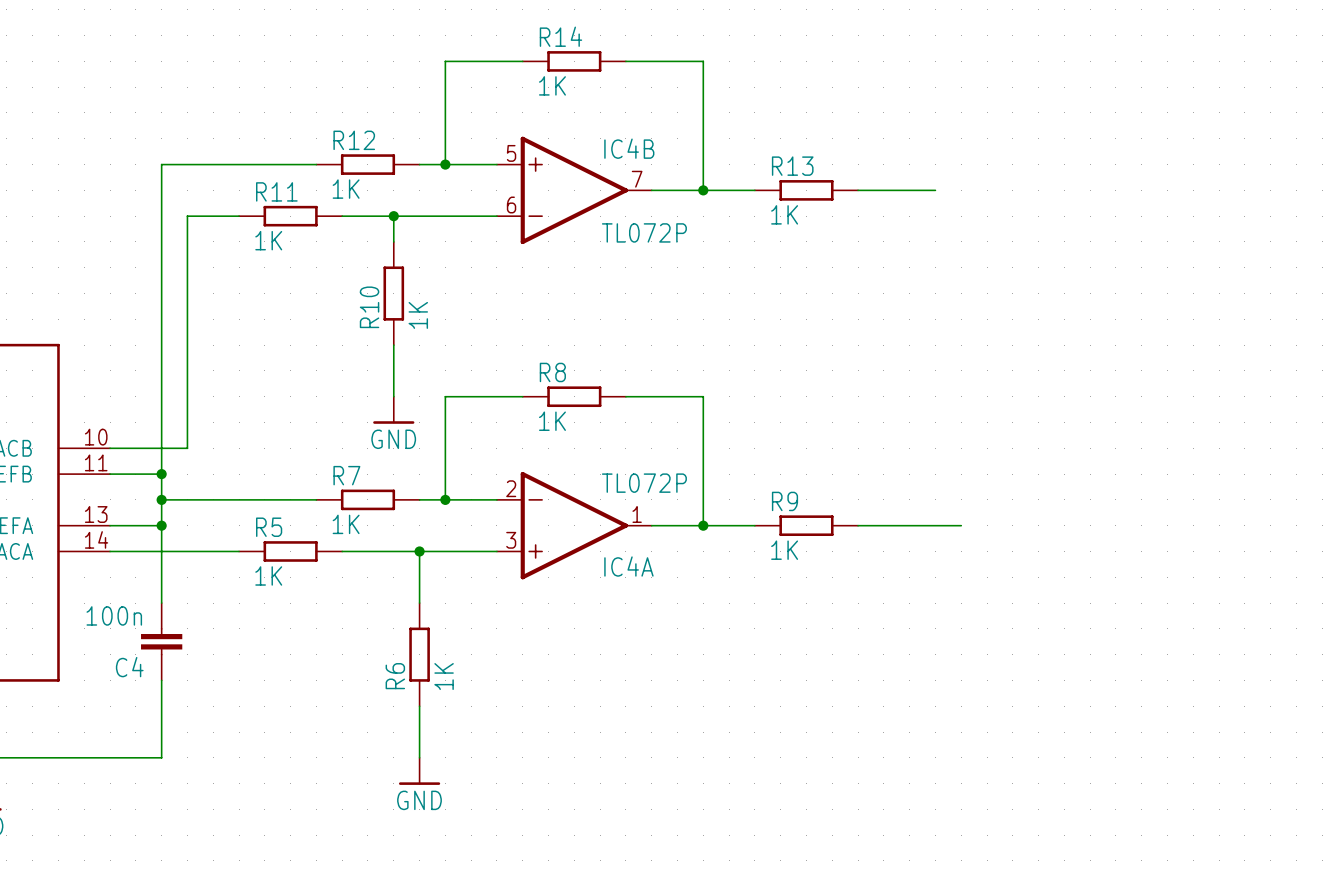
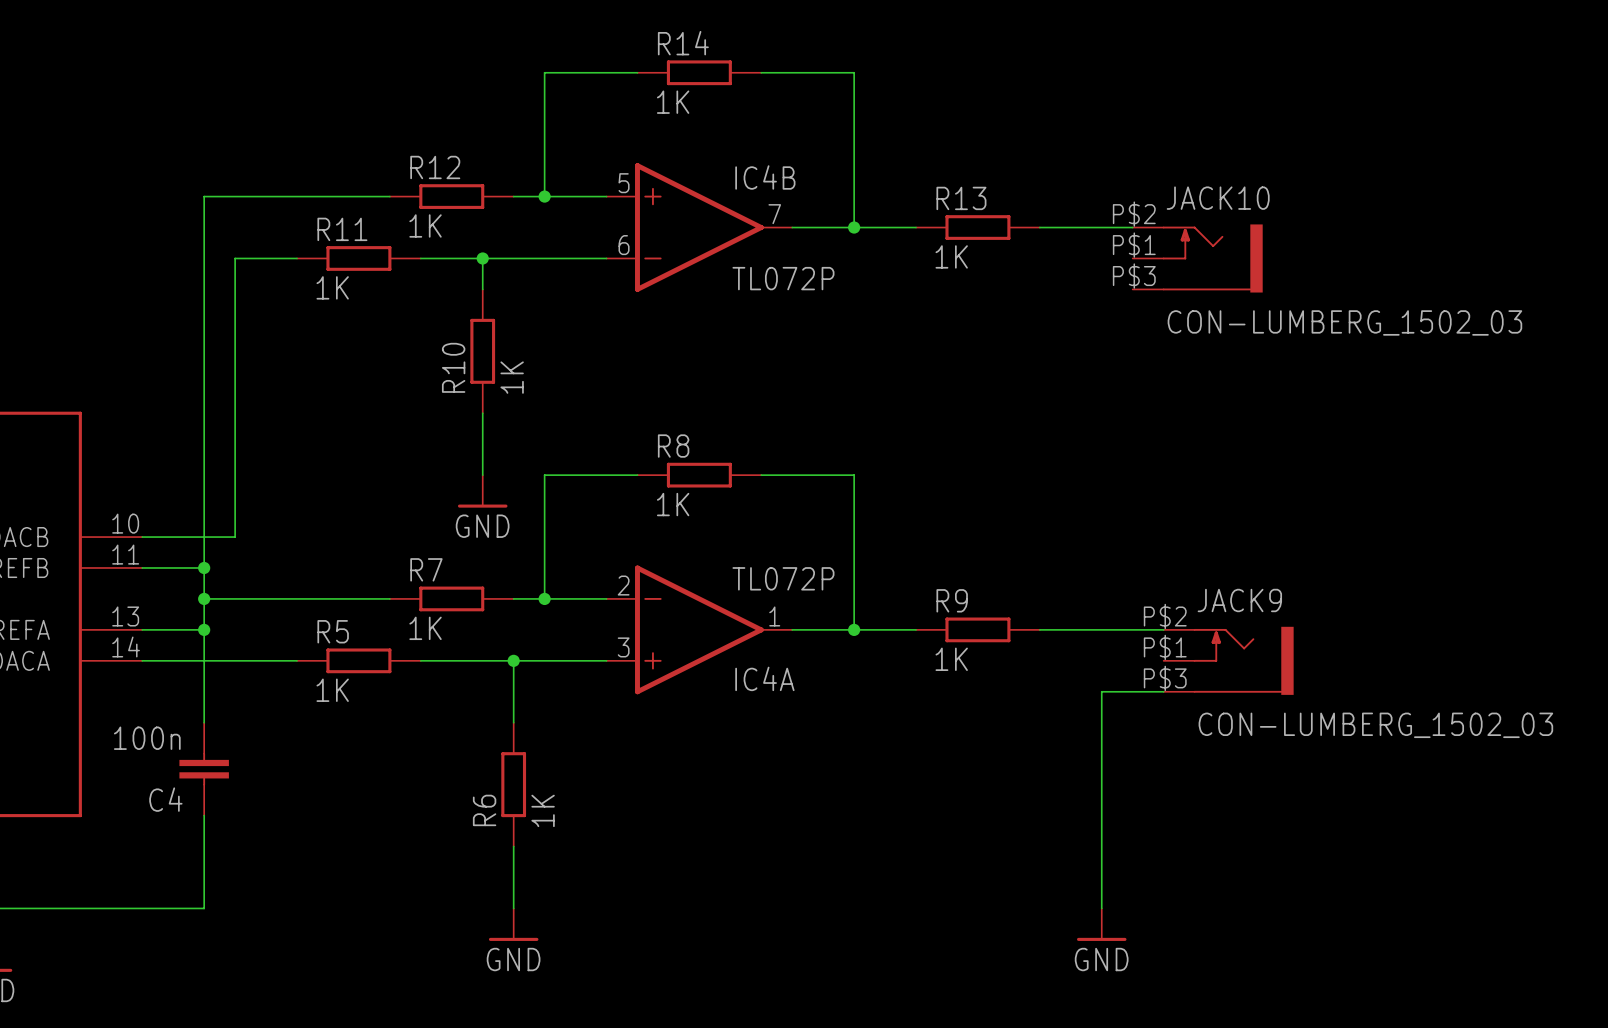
JACK10: none -> CON-LUMBERG_1502_03 (1197, 258)
JACK9: none -> CON-LUMBERG_1502_03 (1228, 660)
wire: none -> (1163, 691) (1101, 691) (1101, 908)
power symbol: none -> GND (1101, 924)

